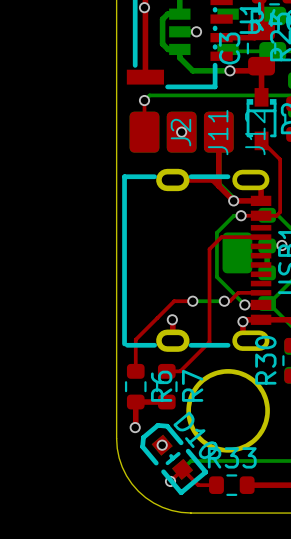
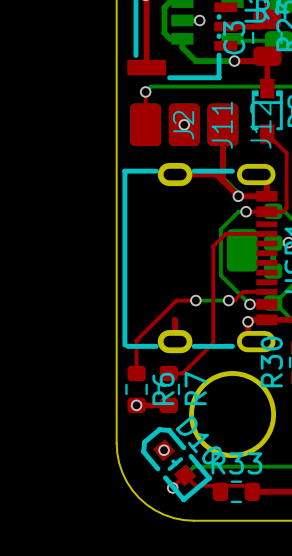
via: (172, 319) -> none
top track: (135, 402) (135, 427) -> none
via position: (135, 427) -> (136, 405)
top track: (192, 479) (198, 485) (216, 485) -> (195, 485) (242, 485)

